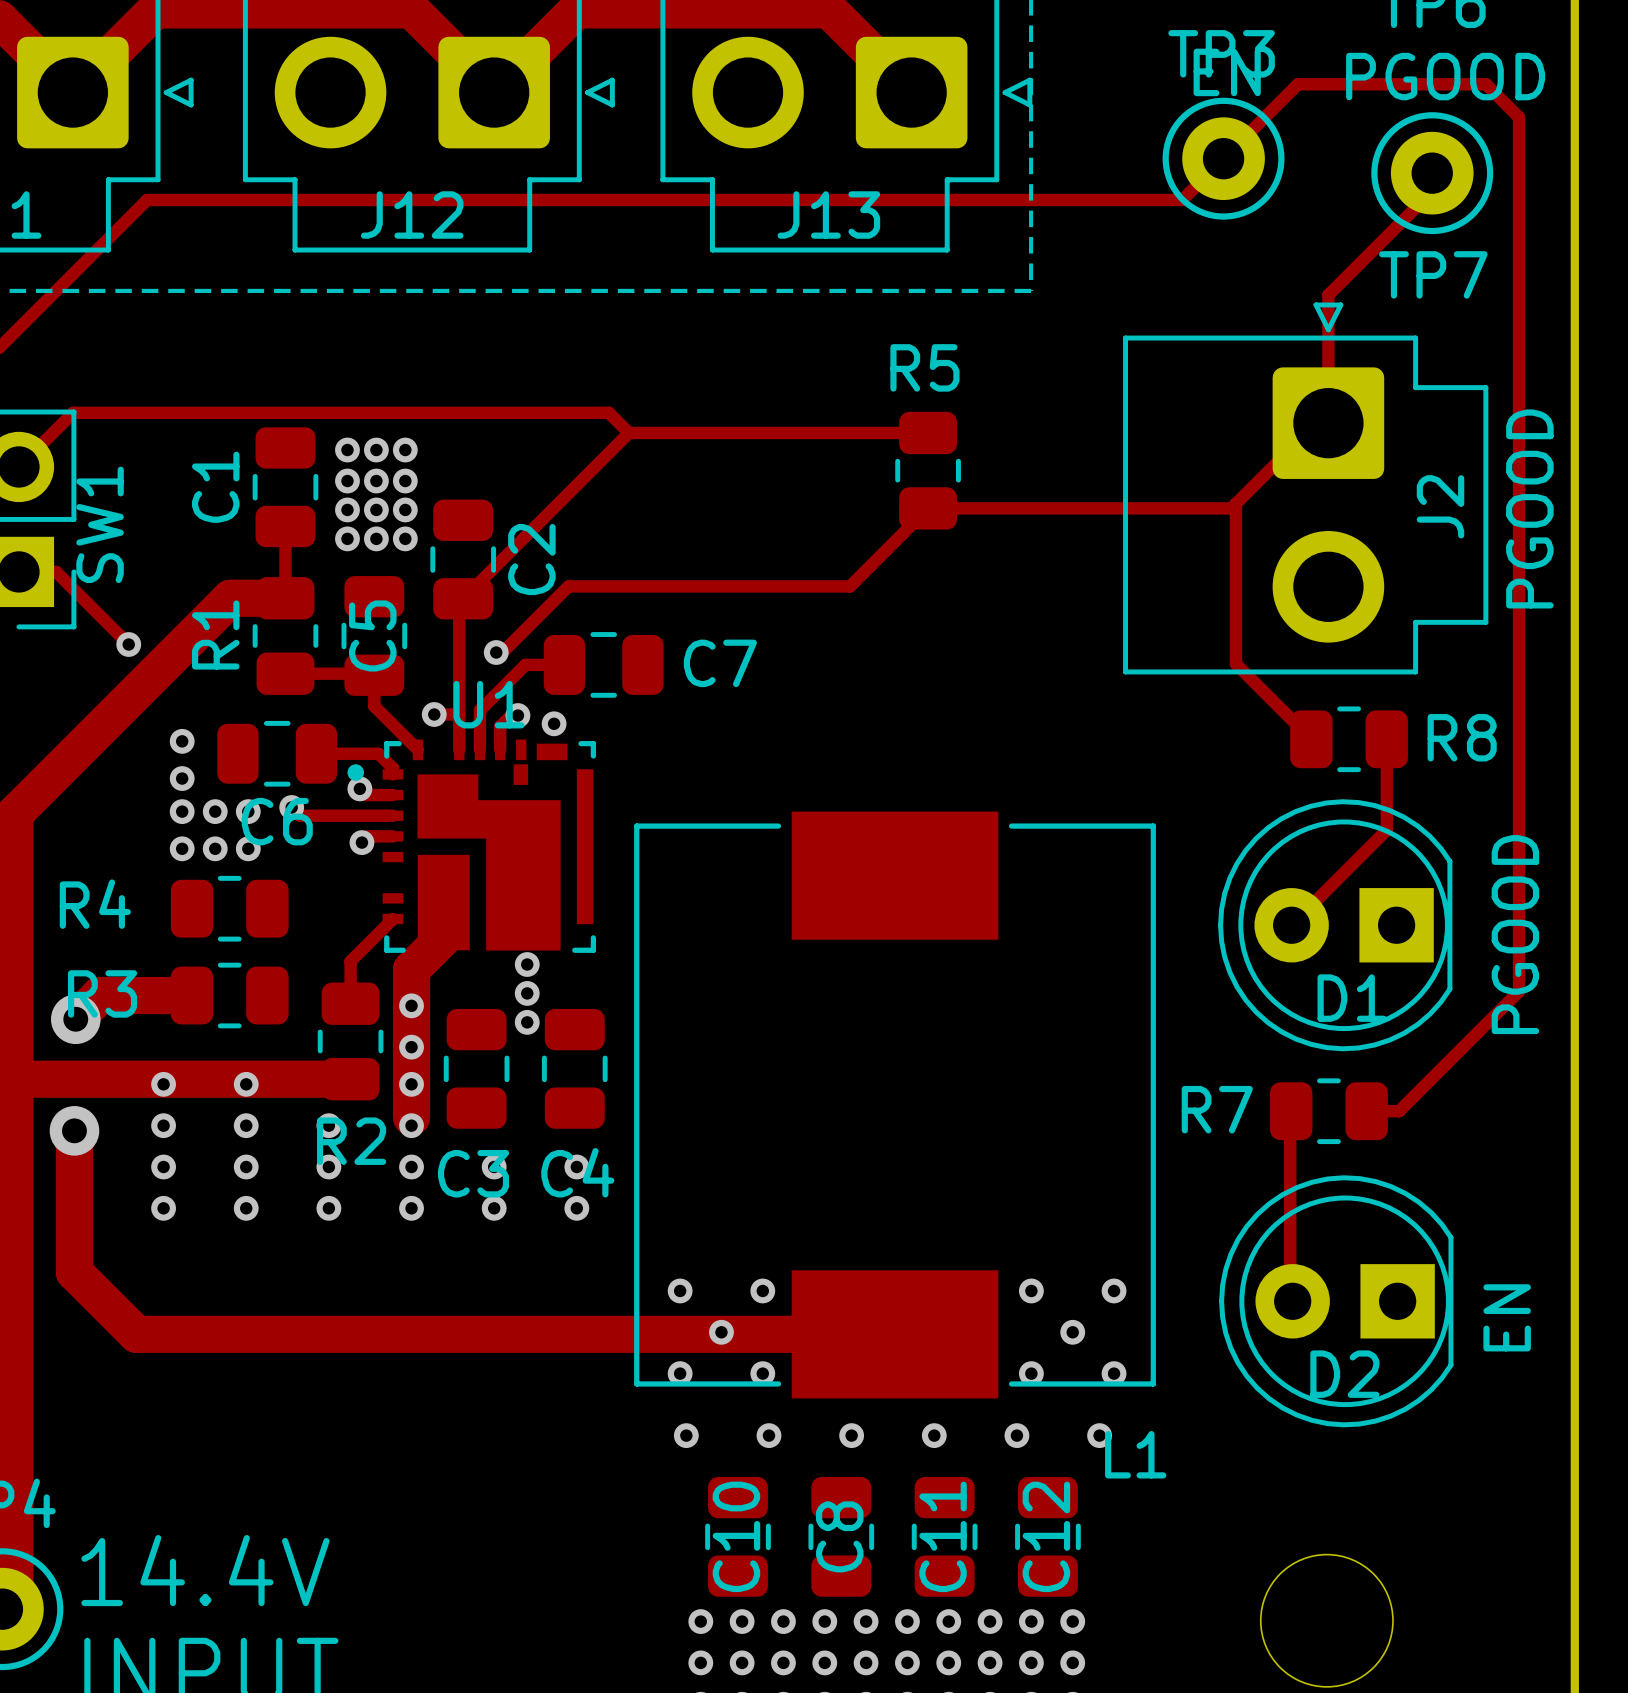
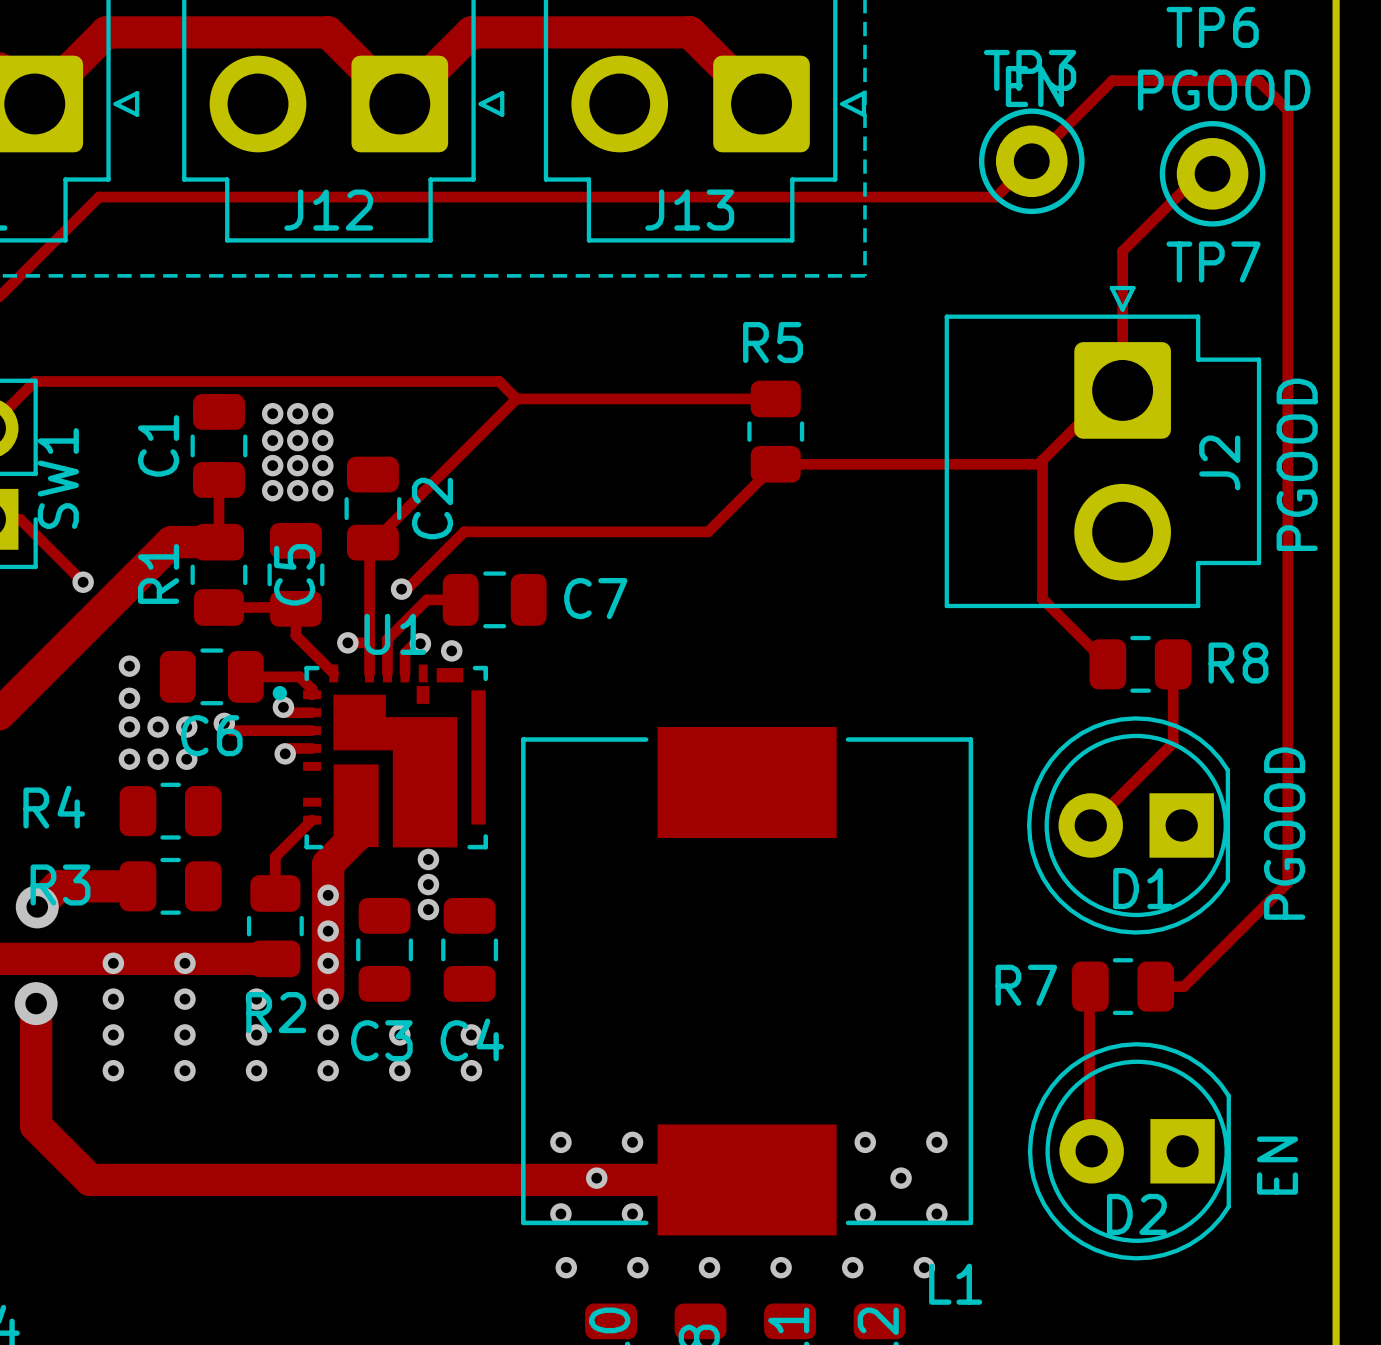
track: (1297, 84) (1485, 84) (1519, 117) -> (1096, 96) (1112, 80) (1258, 80) (1287, 110) (1287, 125)
track: (1450, 173) (1328, 295) -> (1212, 161) (1122, 251) (1122, 279)

